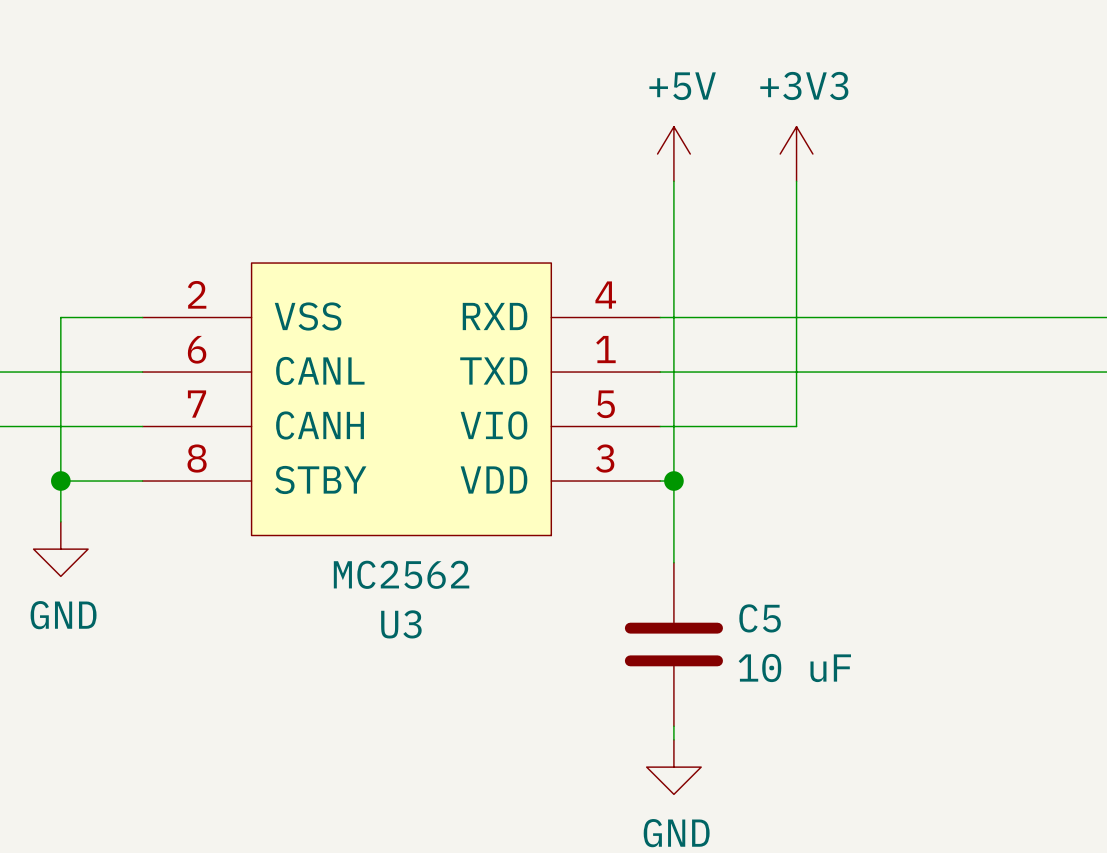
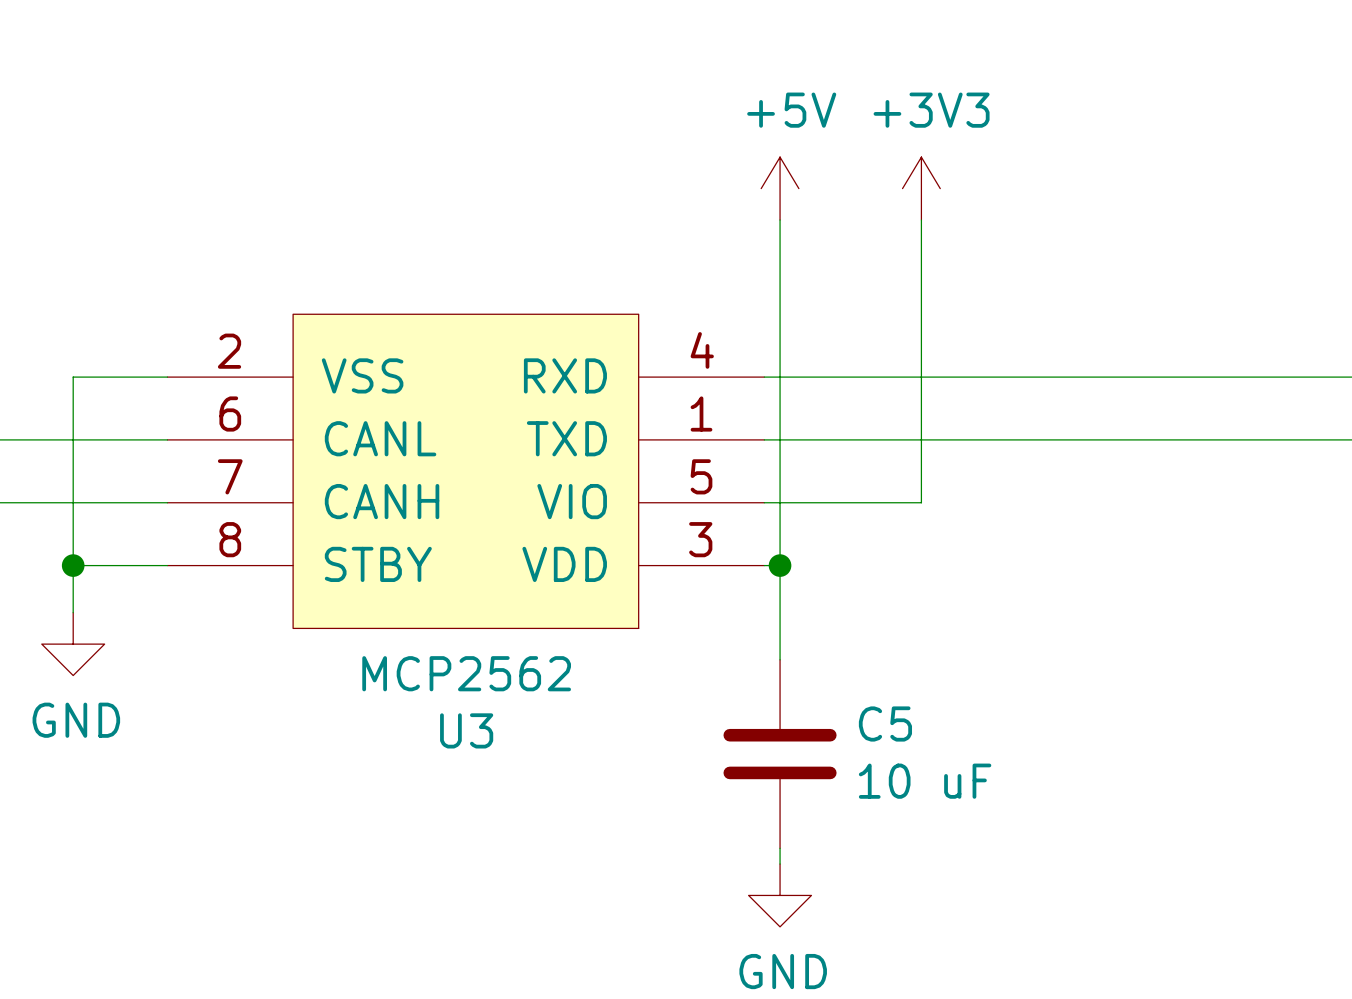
U3 value: MC2562 (401, 574) -> MCP2562 (466, 673)

